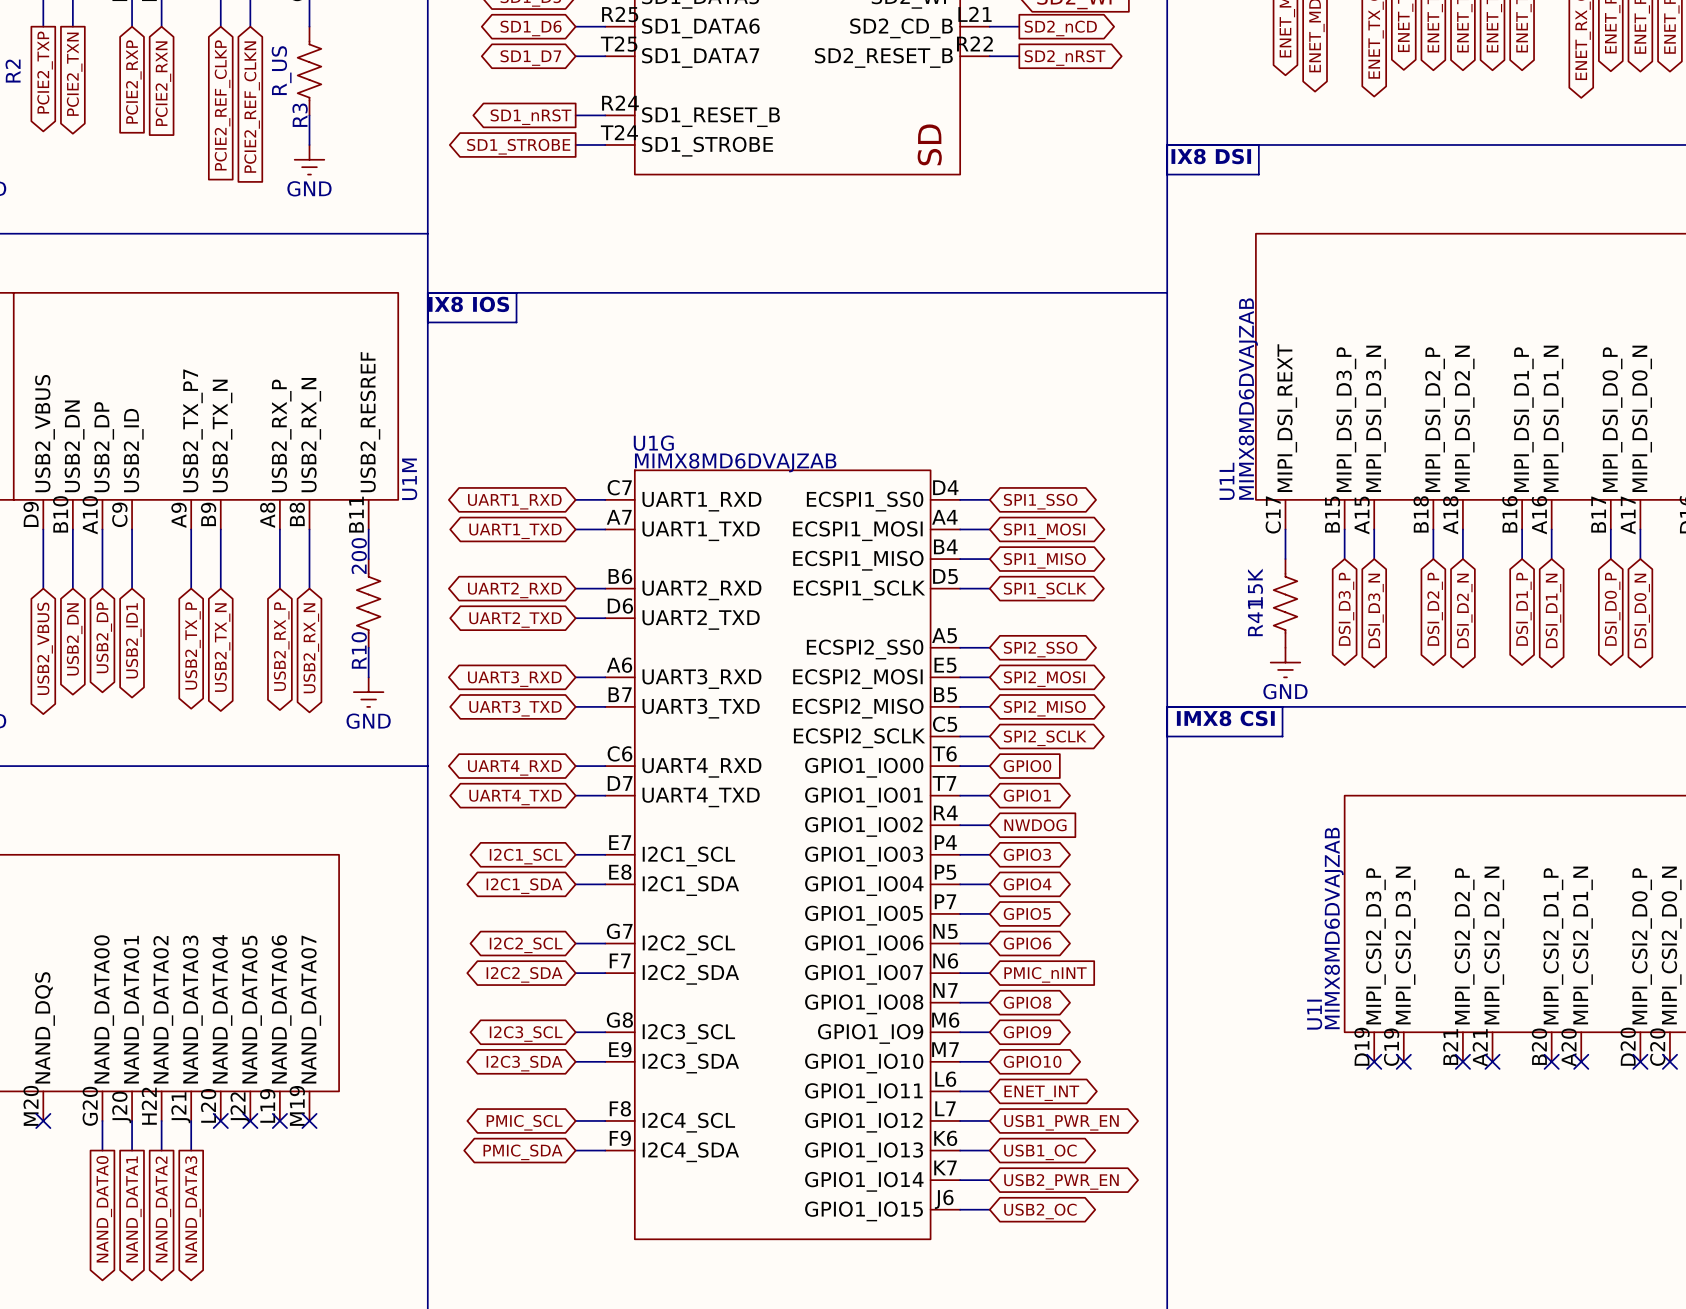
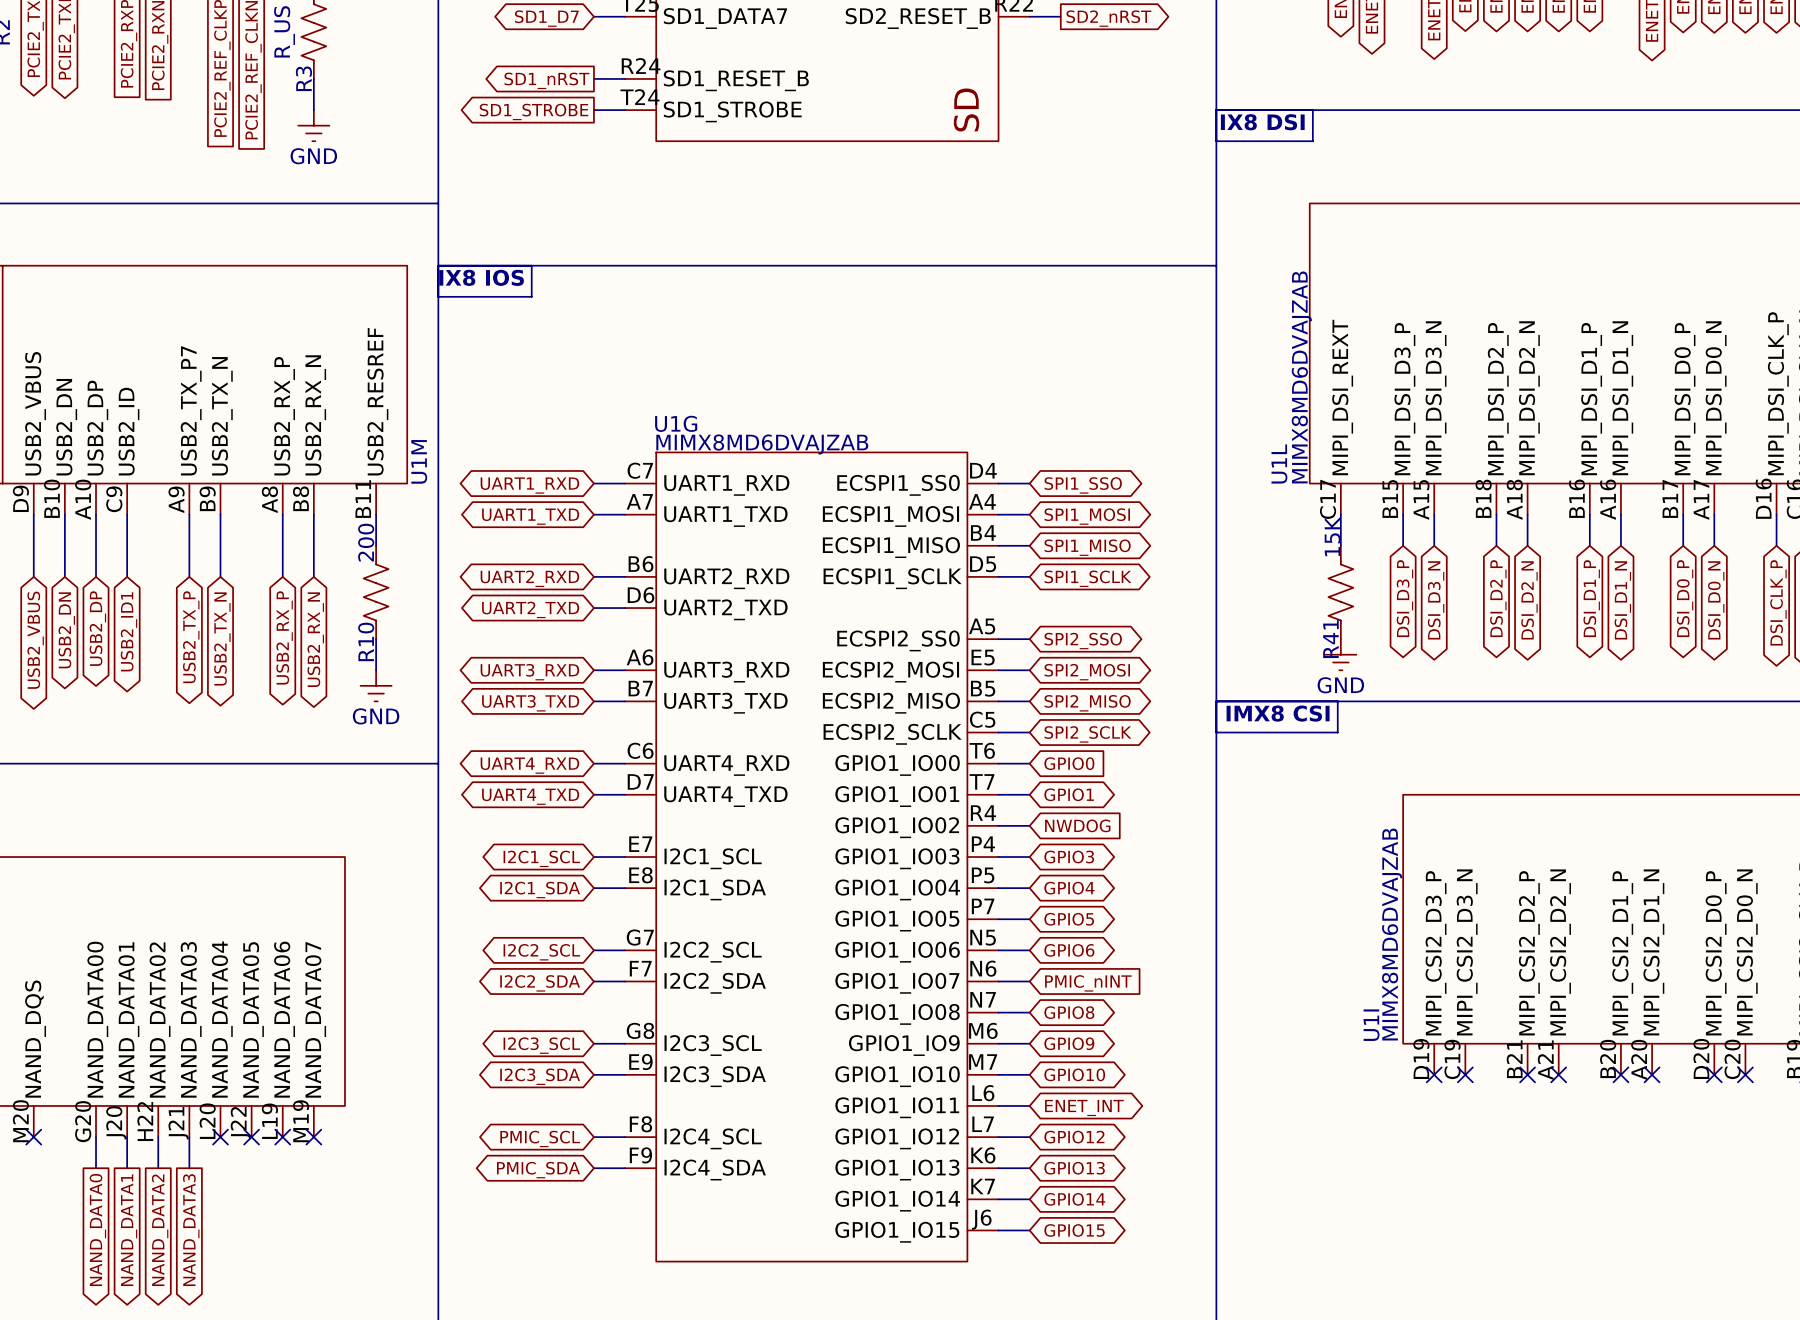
R41 value position: 15K (1255, 587) -> 15K (1332, 536)
R41 name position: R41 (1255, 618) -> R41 (1330, 639)
global label: USB1_PWR_EN (1061, 1122) -> GPIO12 (1074, 1137)
global label: USB1_OC (1040, 1152) -> GPIO13 (1074, 1168)
global label: USB2_PWR_EN (1061, 1181) -> GPIO14 (1074, 1199)
global label: USB2_OC (1040, 1211) -> GPIO15 (1074, 1230)

